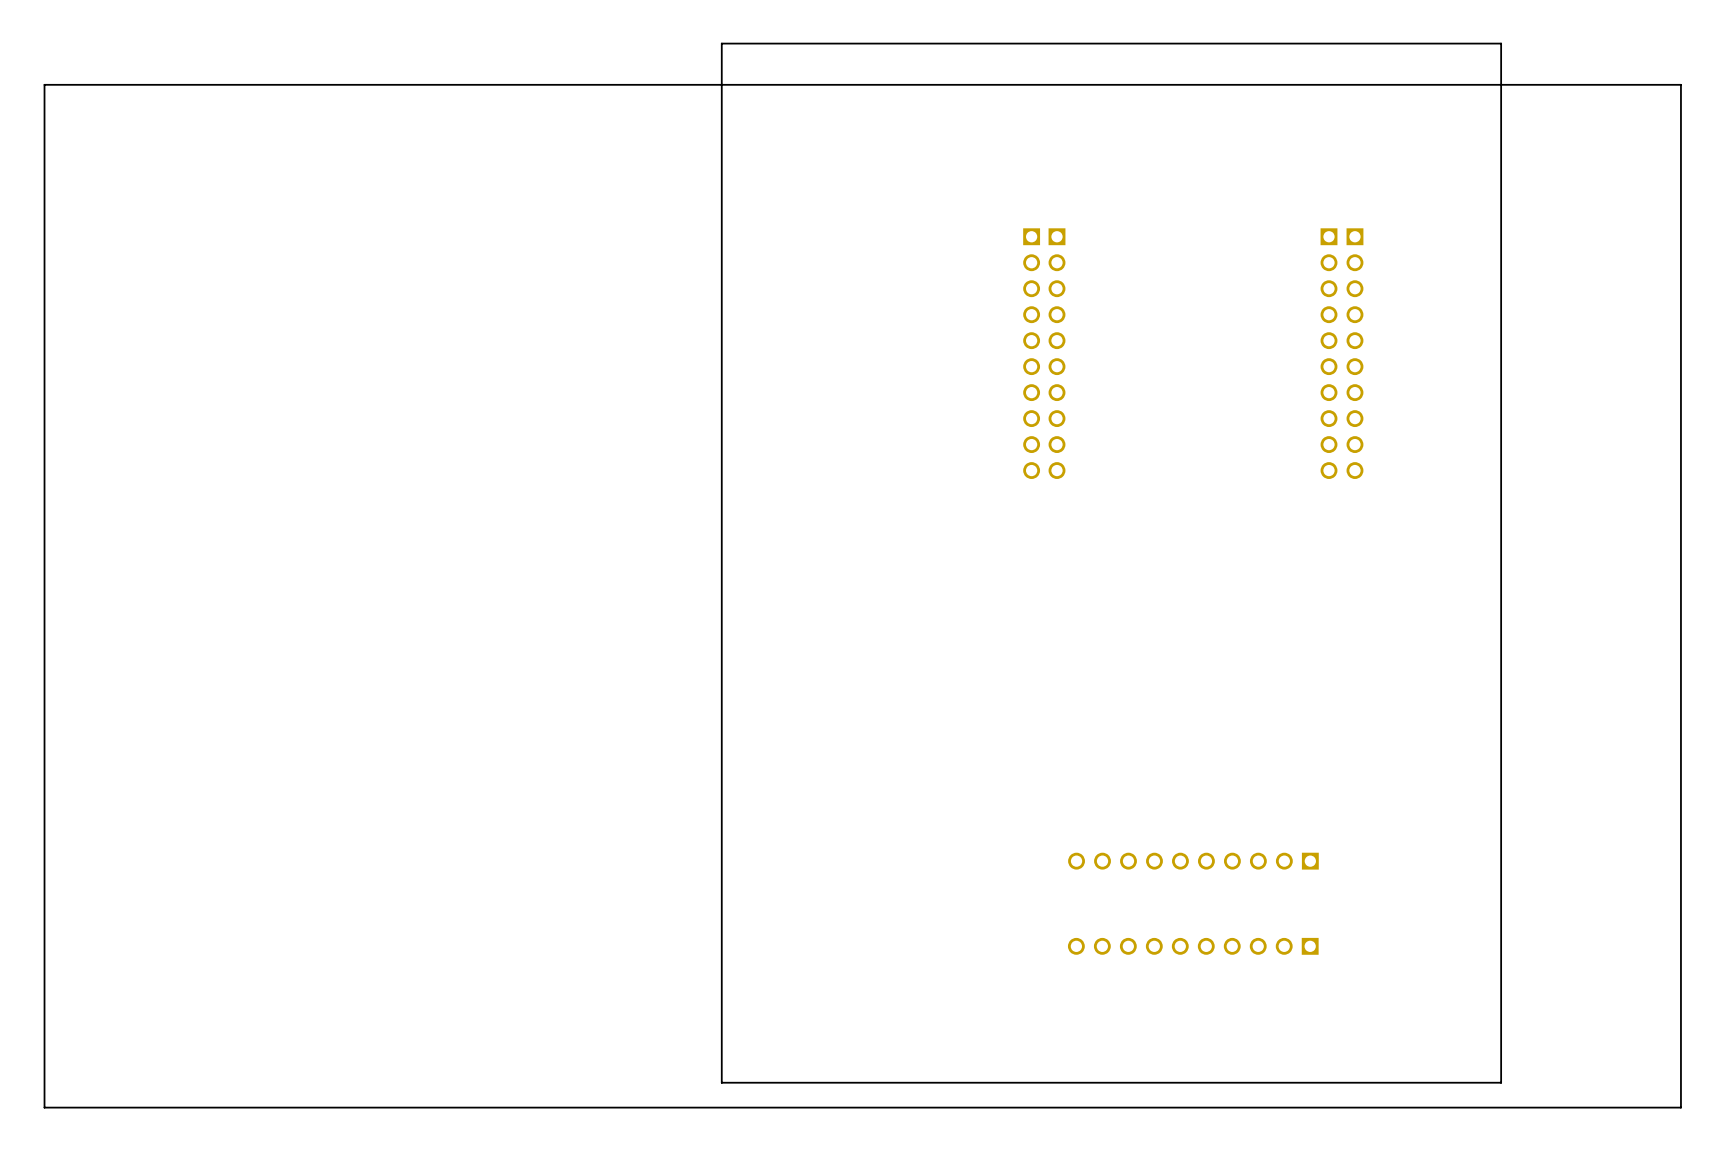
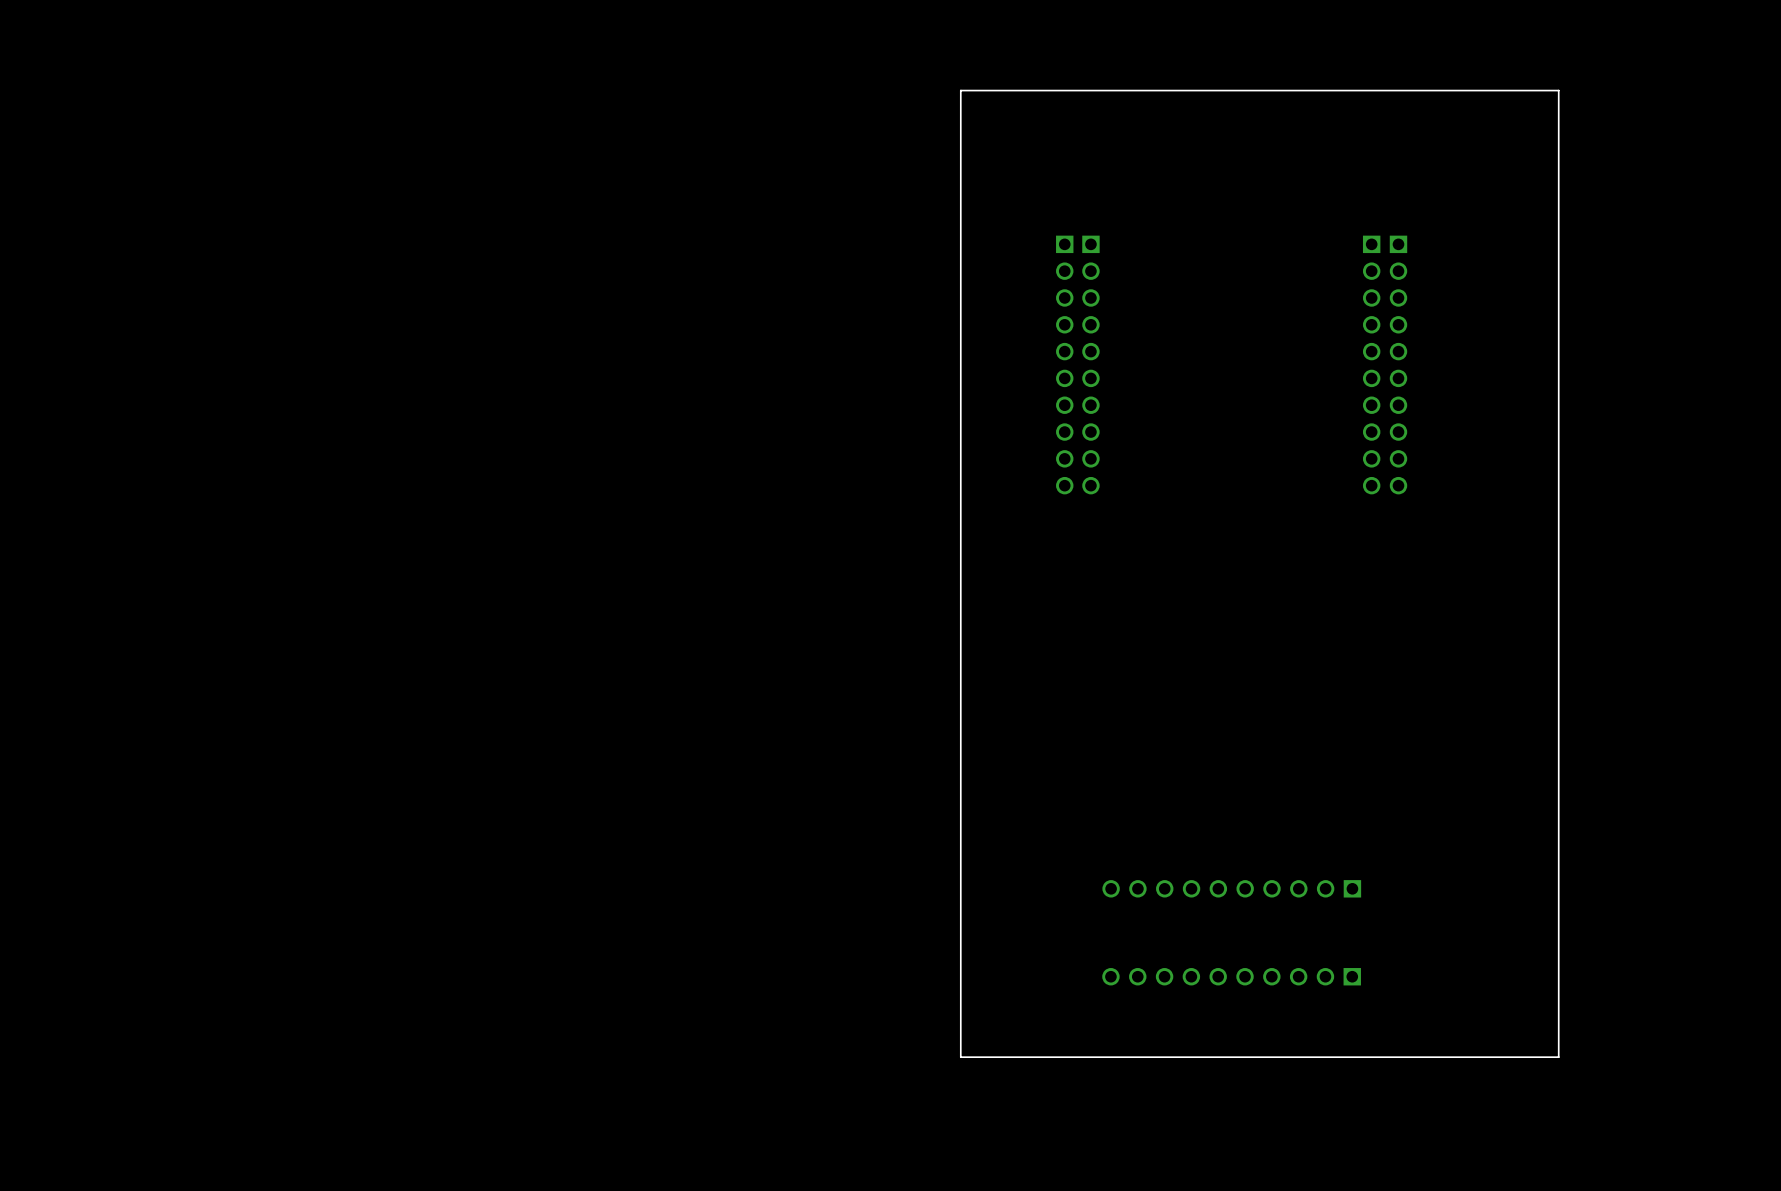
board edge: (1501, 43) (1501, 1082) (721, 1082) (721, 43) (1501, 43) -> (1558, 90) (1558, 1057) (960, 1057) (960, 90) (1558, 90)
board edge: (1680, 84) (44, 84) (44, 1107) (1680, 1107) (1680, 84) -> none

